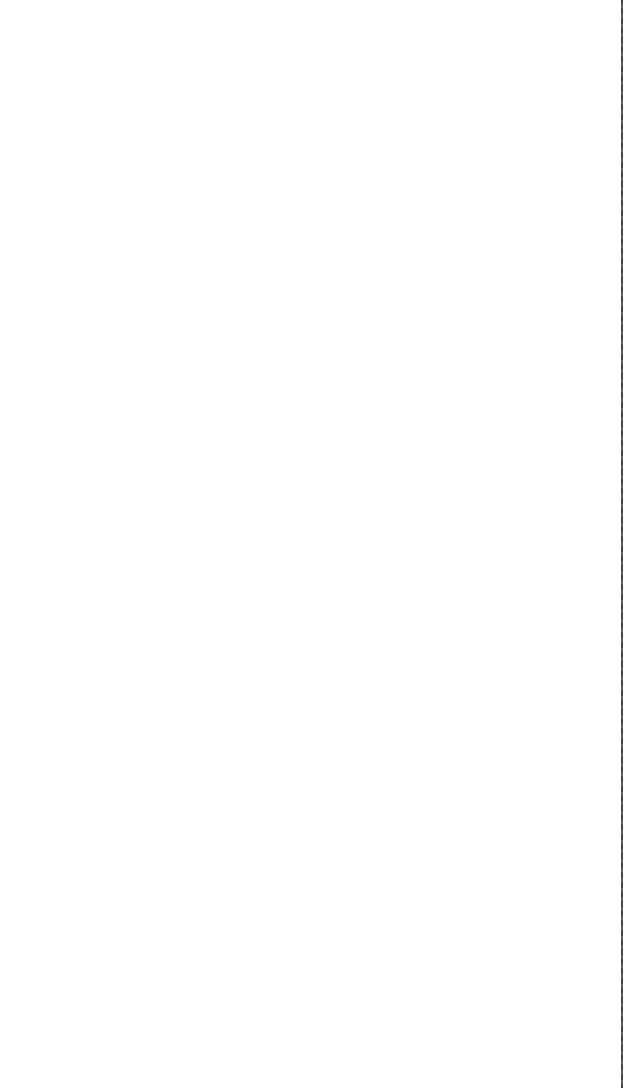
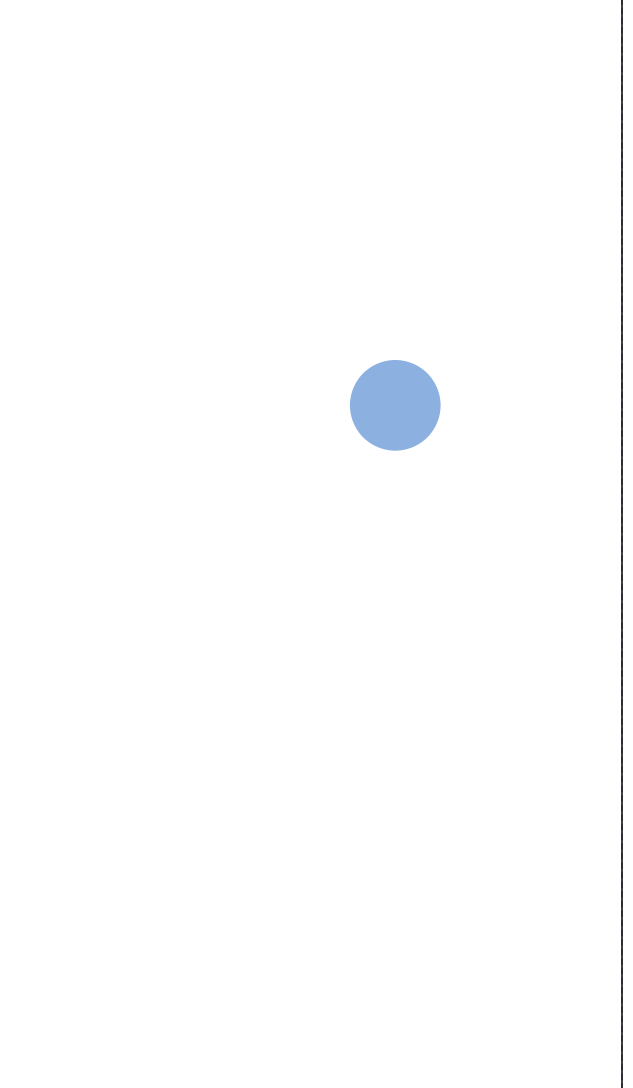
drawing: none -> [349, 359, 441, 451]

